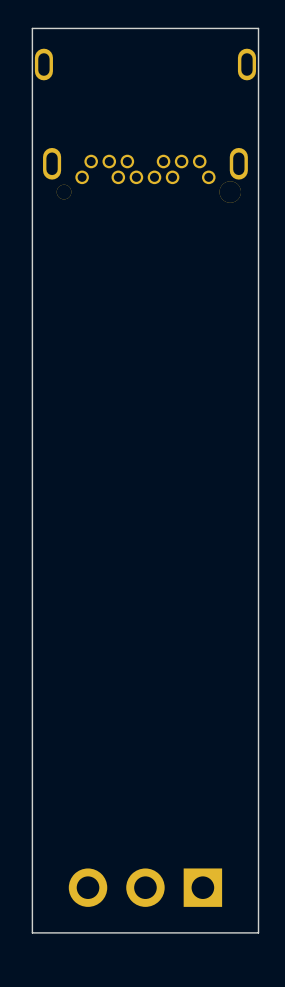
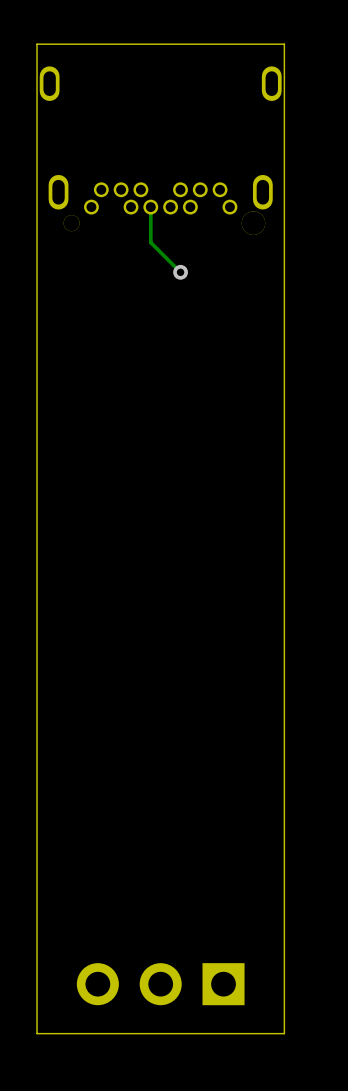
track: none -> (150, 207) (150, 242) (180, 272)
via: none -> (180, 272)

